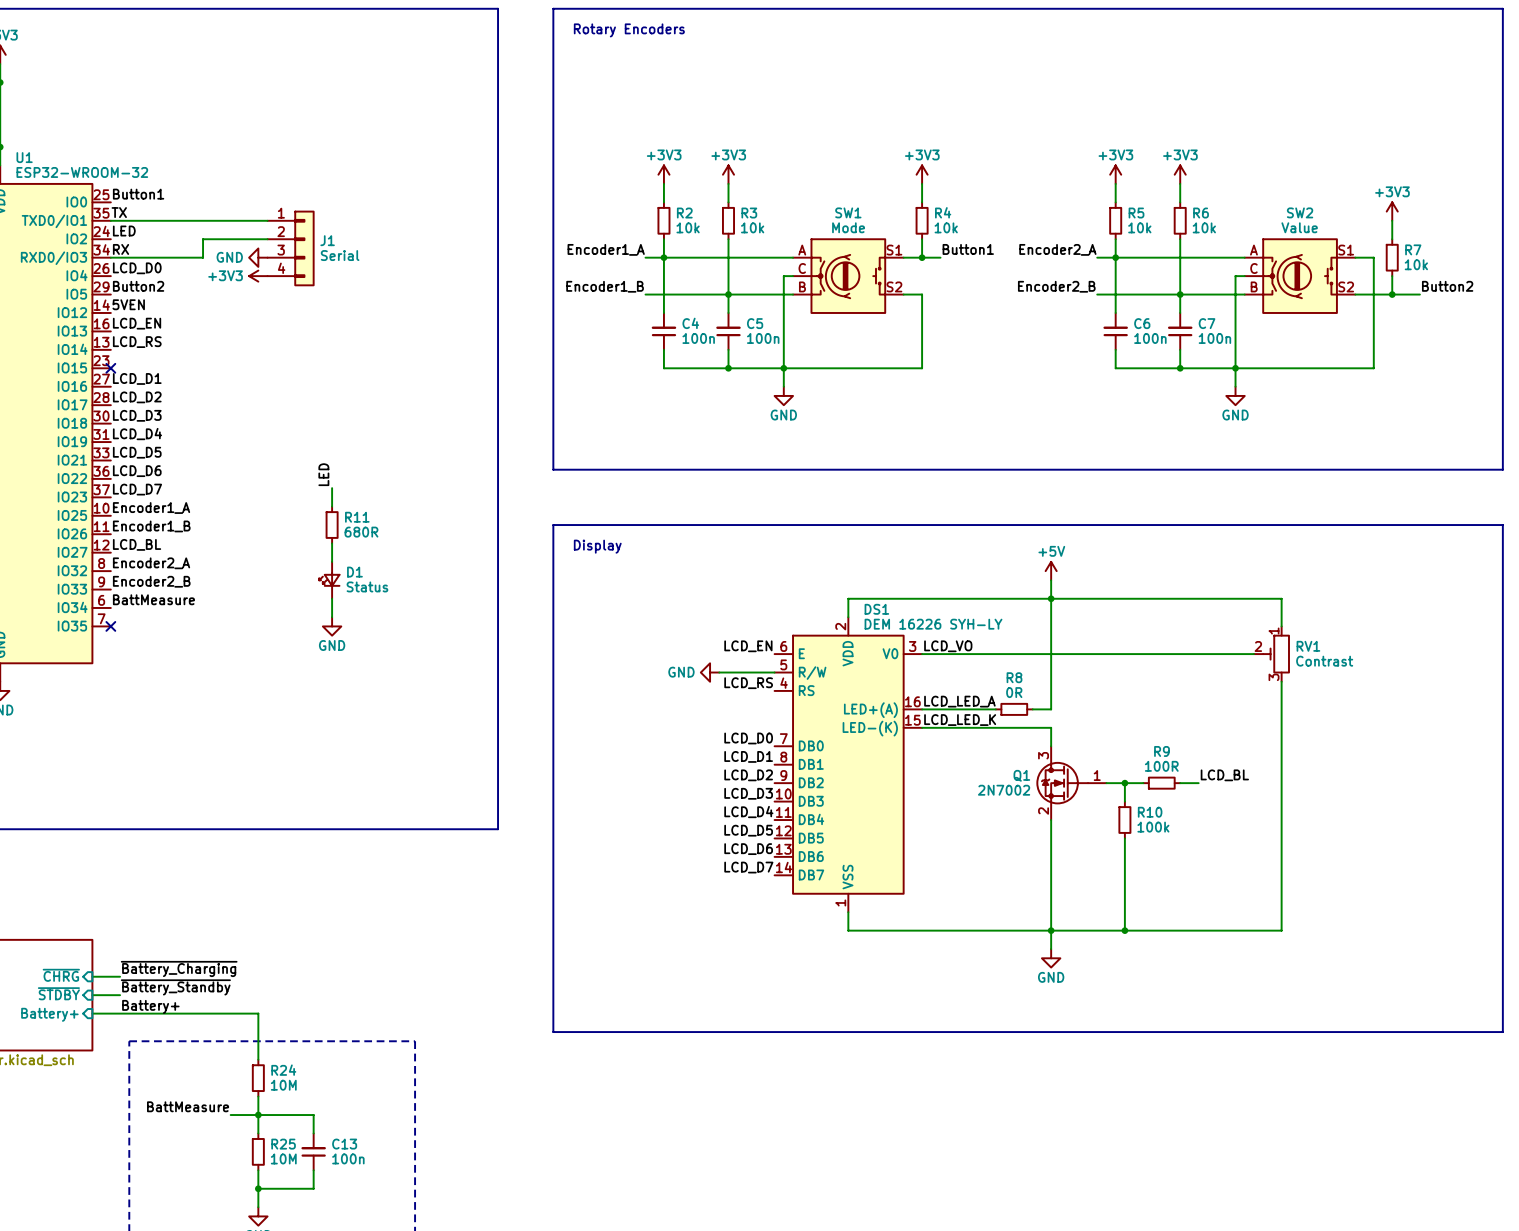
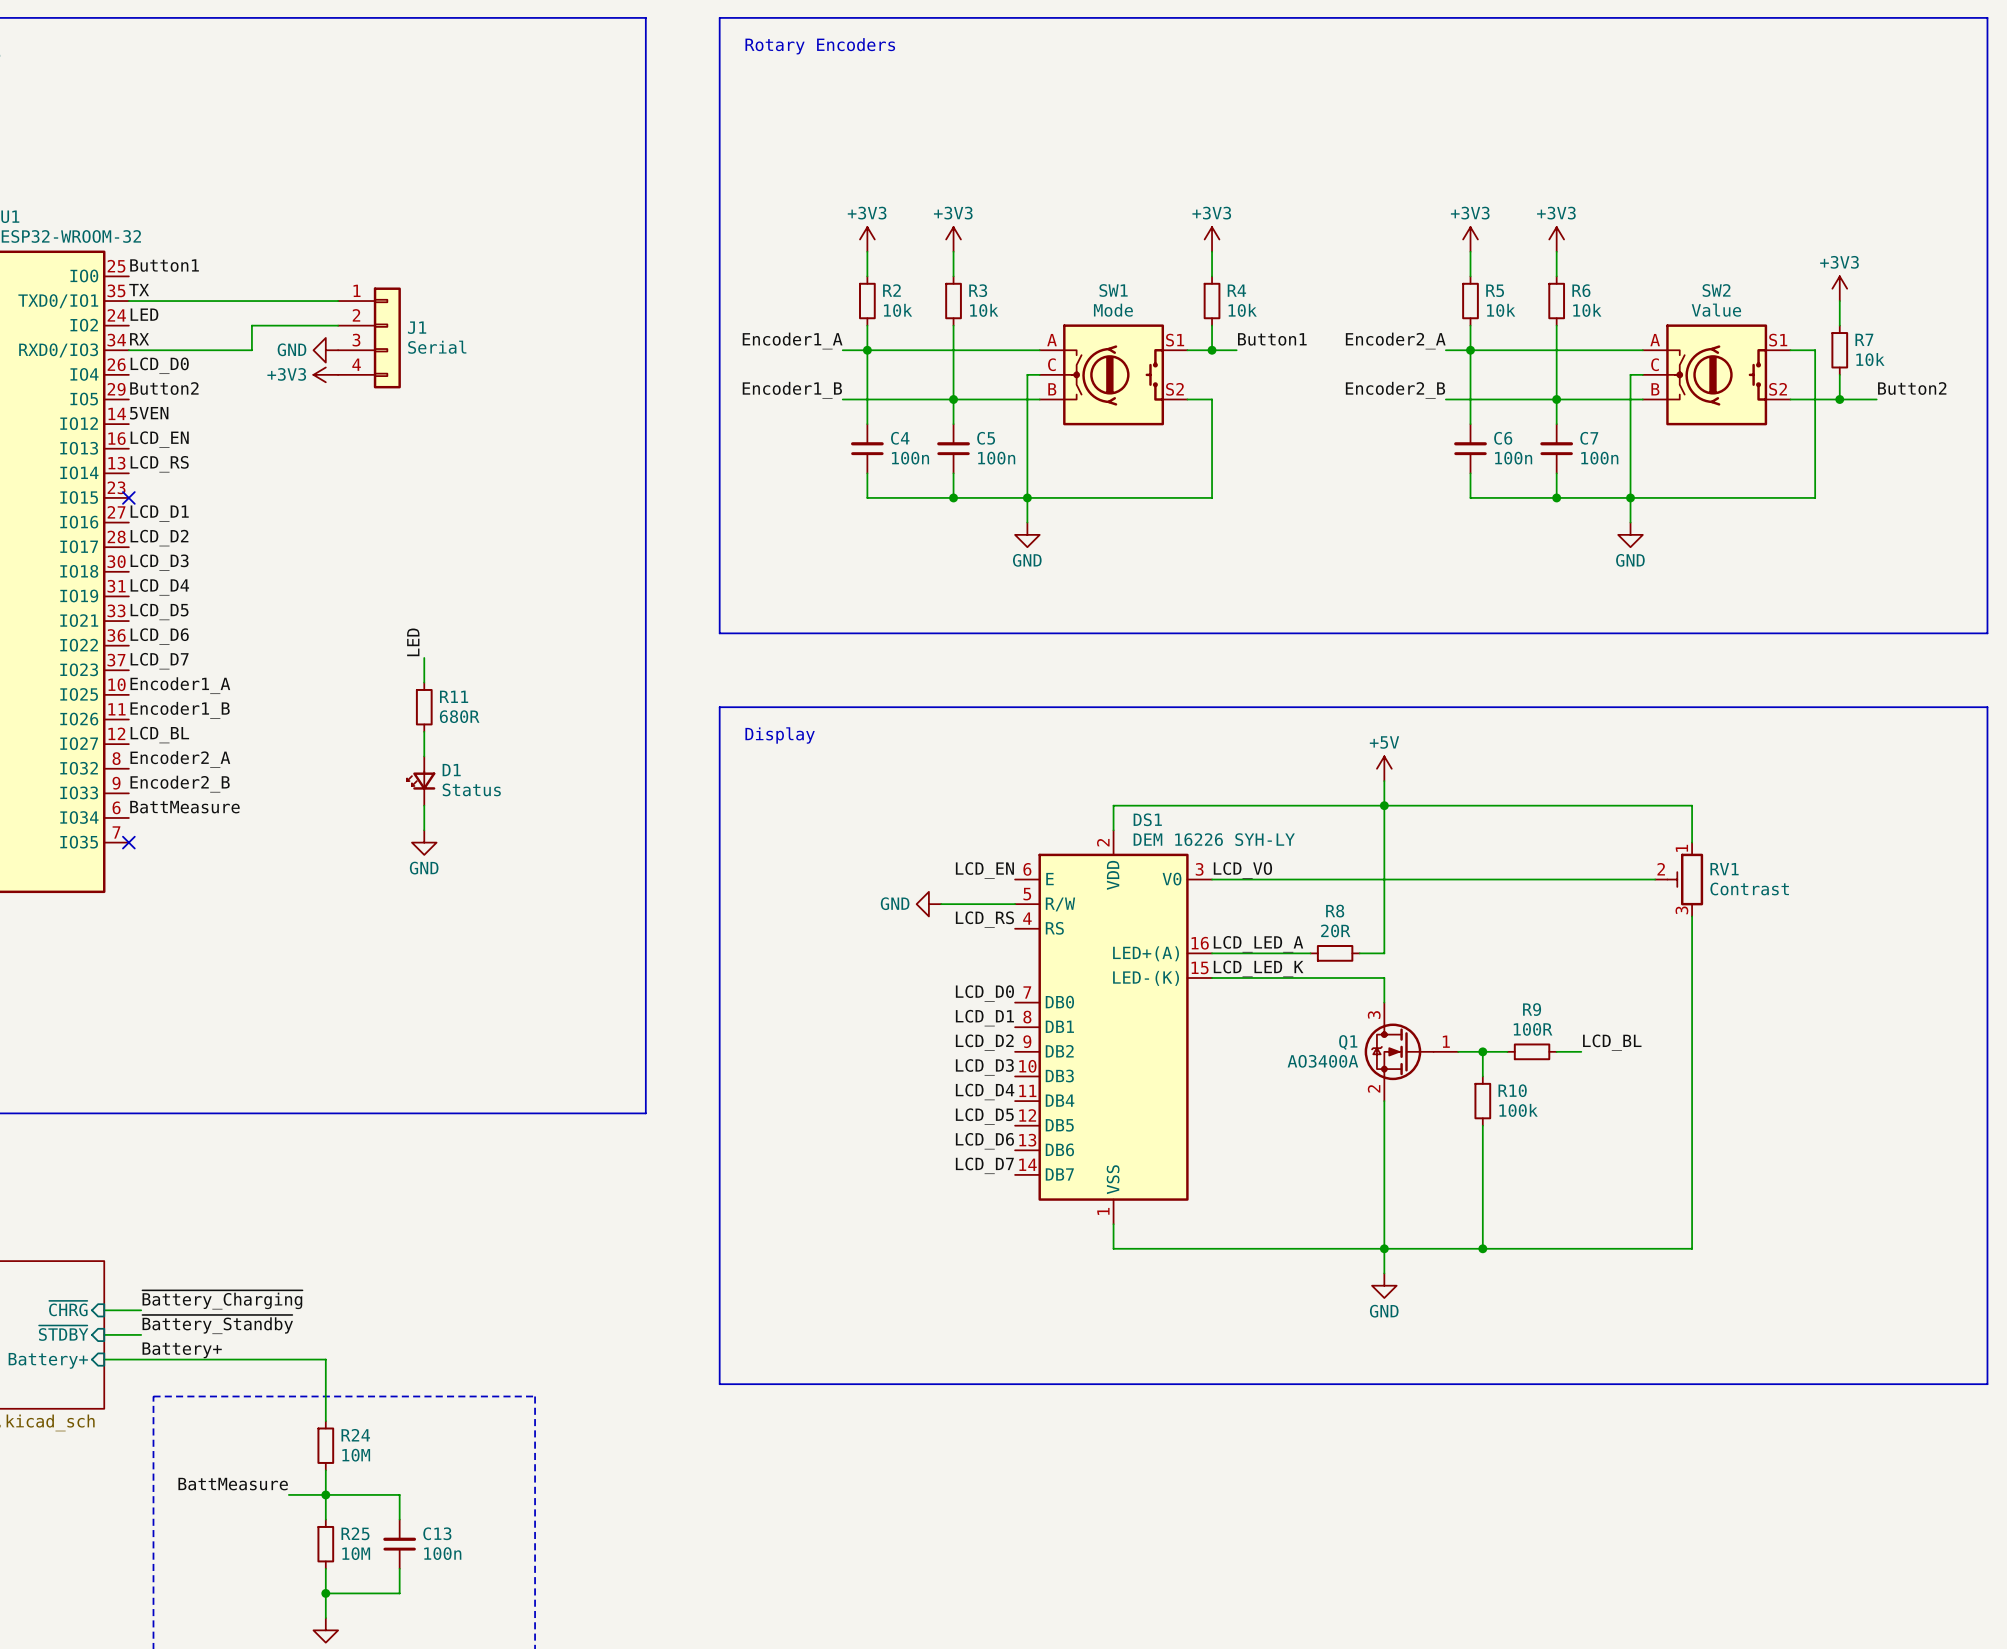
R8 value: 0R (1014, 692) -> 20R (1335, 930)
Q1 value: 2N7002 (1004, 790) -> AO3400A (1322, 1061)

